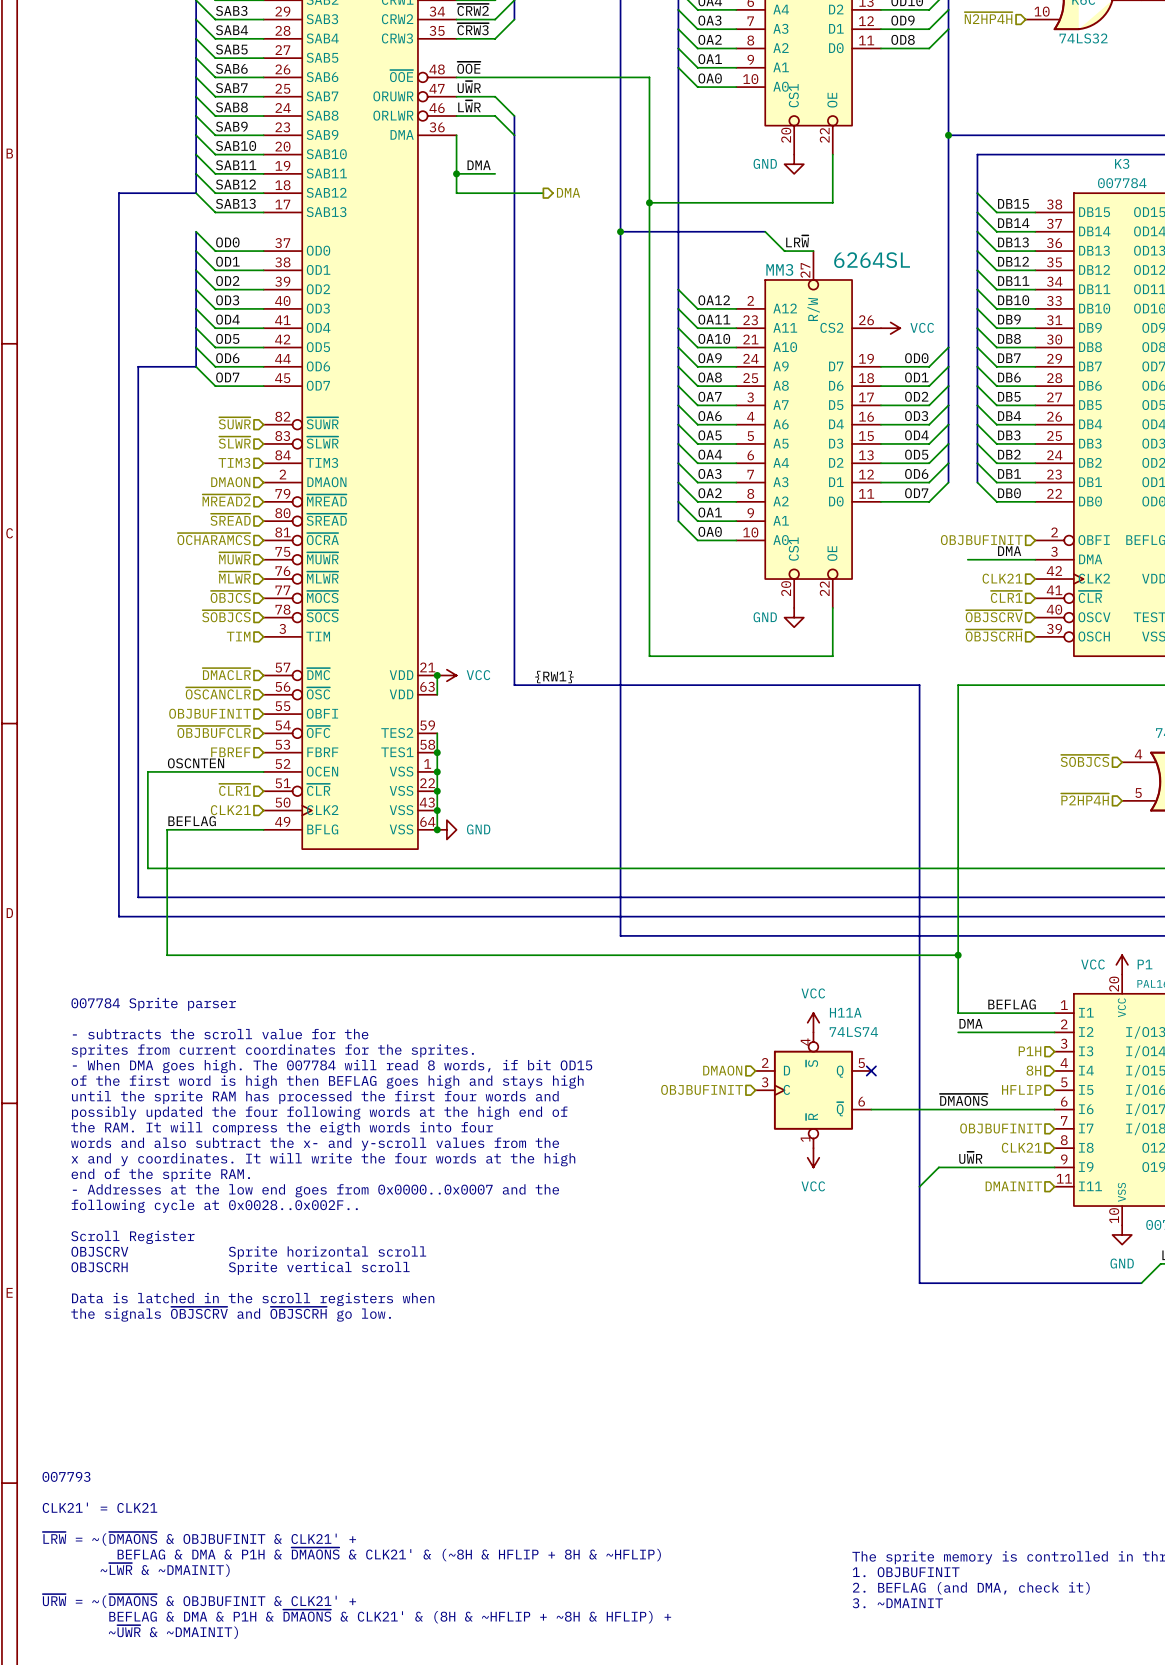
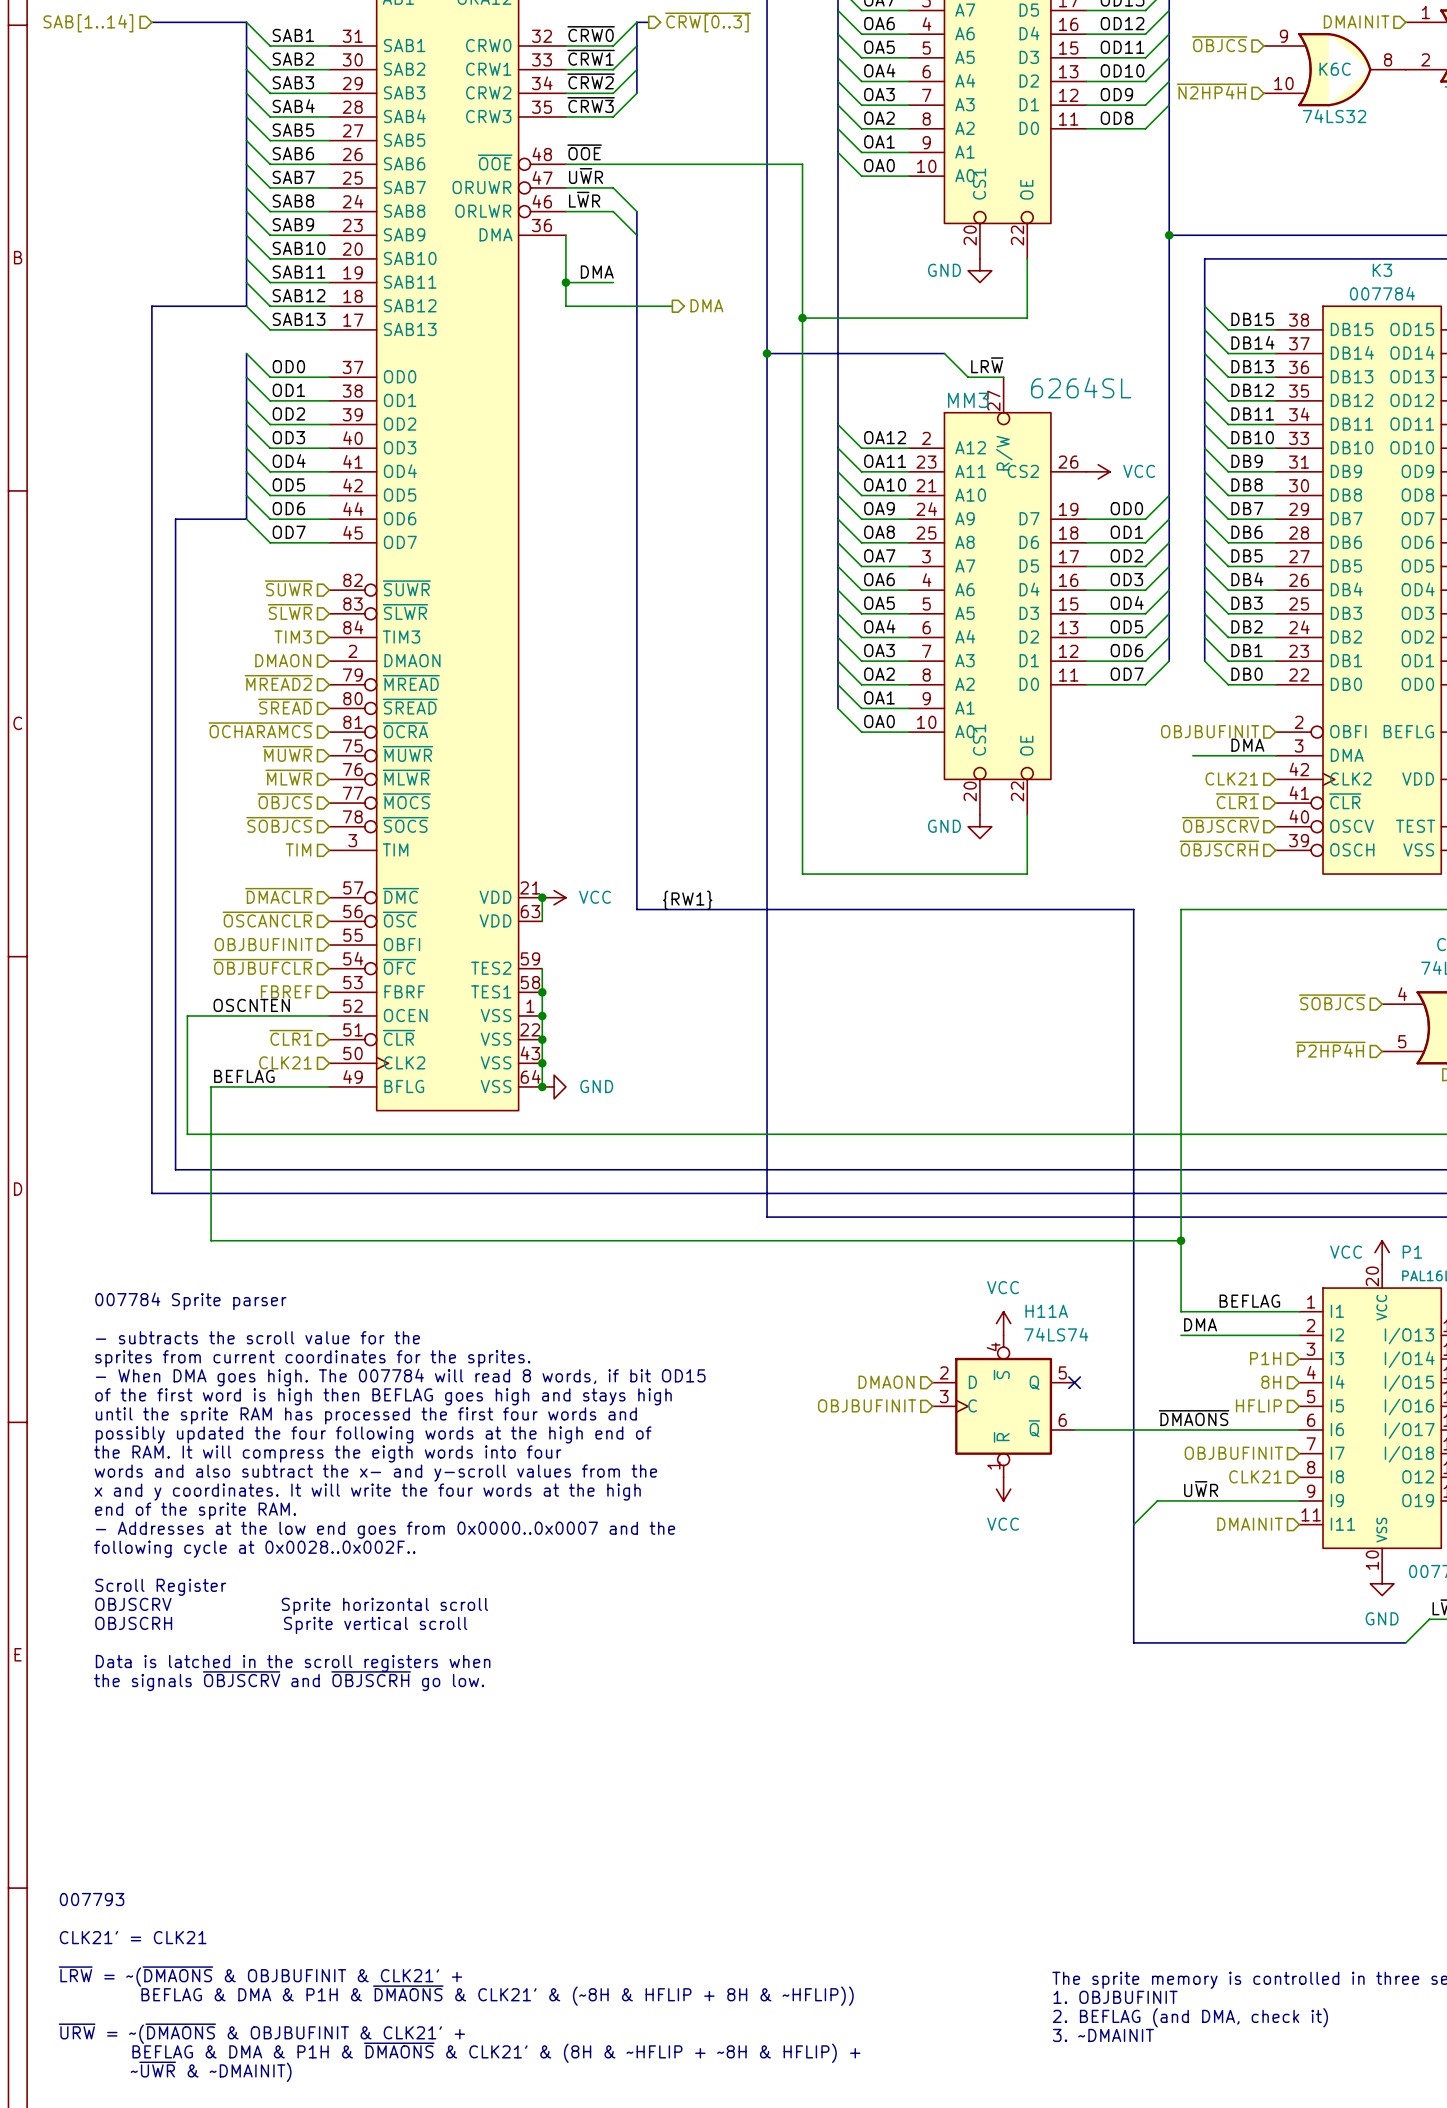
text position: 007793 (66, 1476) -> 007793 (92, 1899)
text position: CLK21' = CLK21 (99, 1507) -> CLK21' = CLK21 (133, 1937)
text: ~{LRW} = ~(~{DMAONS} & OBJBUFINIT & CLK21' + (199, 1538) -> none
text: BEFLAG & DMA & P1H & ~{DMAONS} & CLK21' & (~8H & HFLIP + 8H & ~HFLIP) (389, 1554) -> ~{LRW} = ~(~{DMAONS} & OBJBUFINIT & CLK21' + (260, 1976)
text: ~~{LWR} & ~DMAINIT) (165, 1569) -> BEFLAG & DMA & P1H & ~{DMAONS} & CLK21' & (~8H & HFLIP + 8H & ~HFLIP)) (497, 1995)

